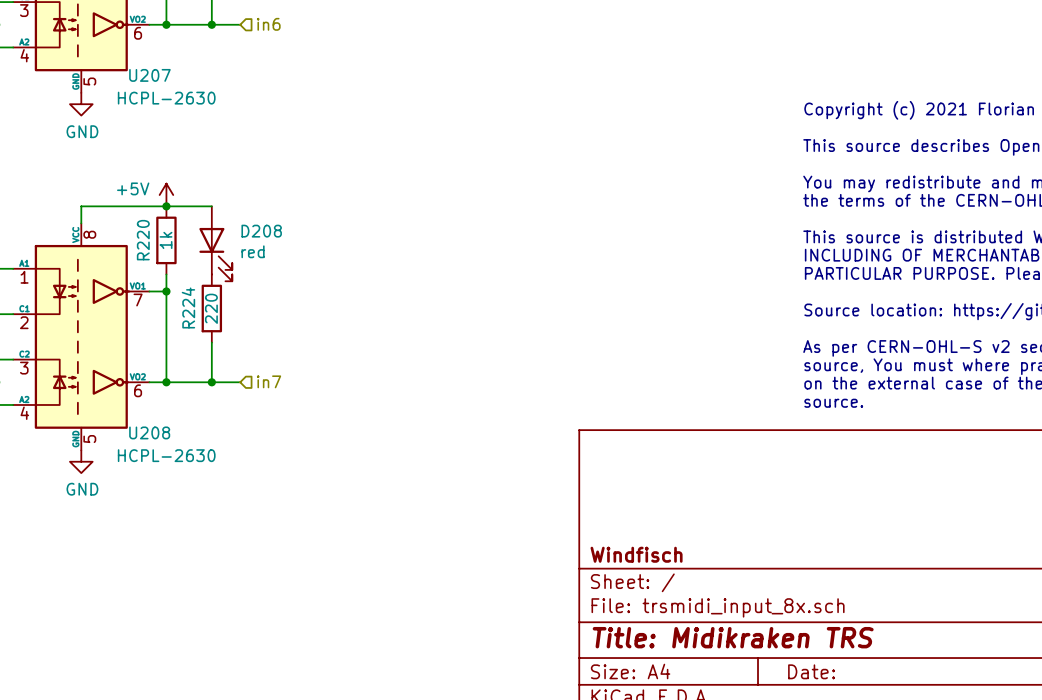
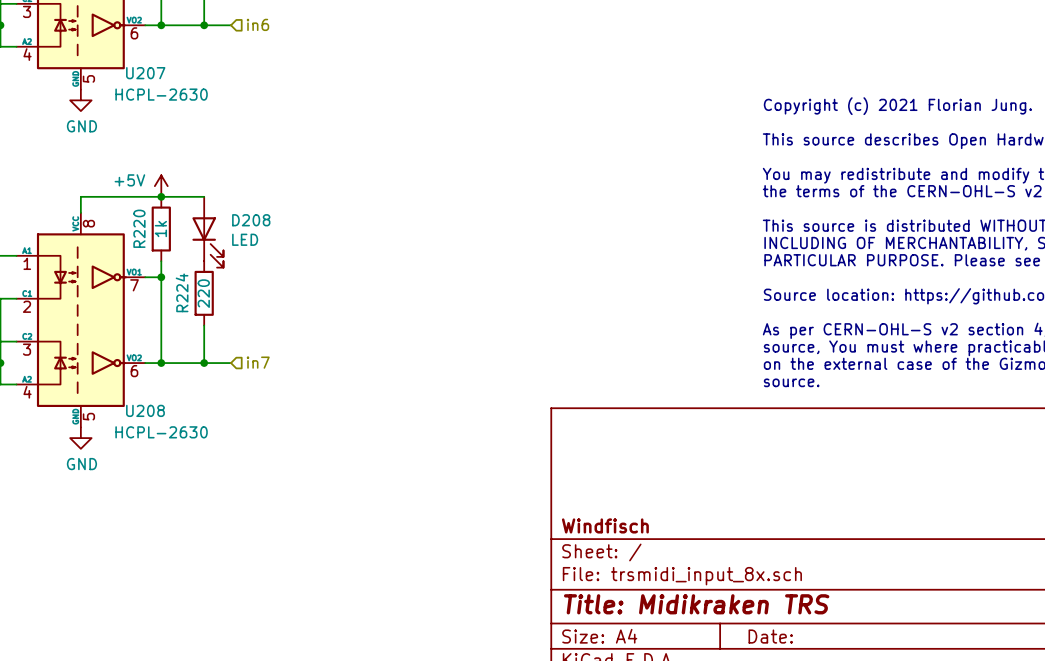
D208 value: red (253, 251) -> LED (245, 239)

